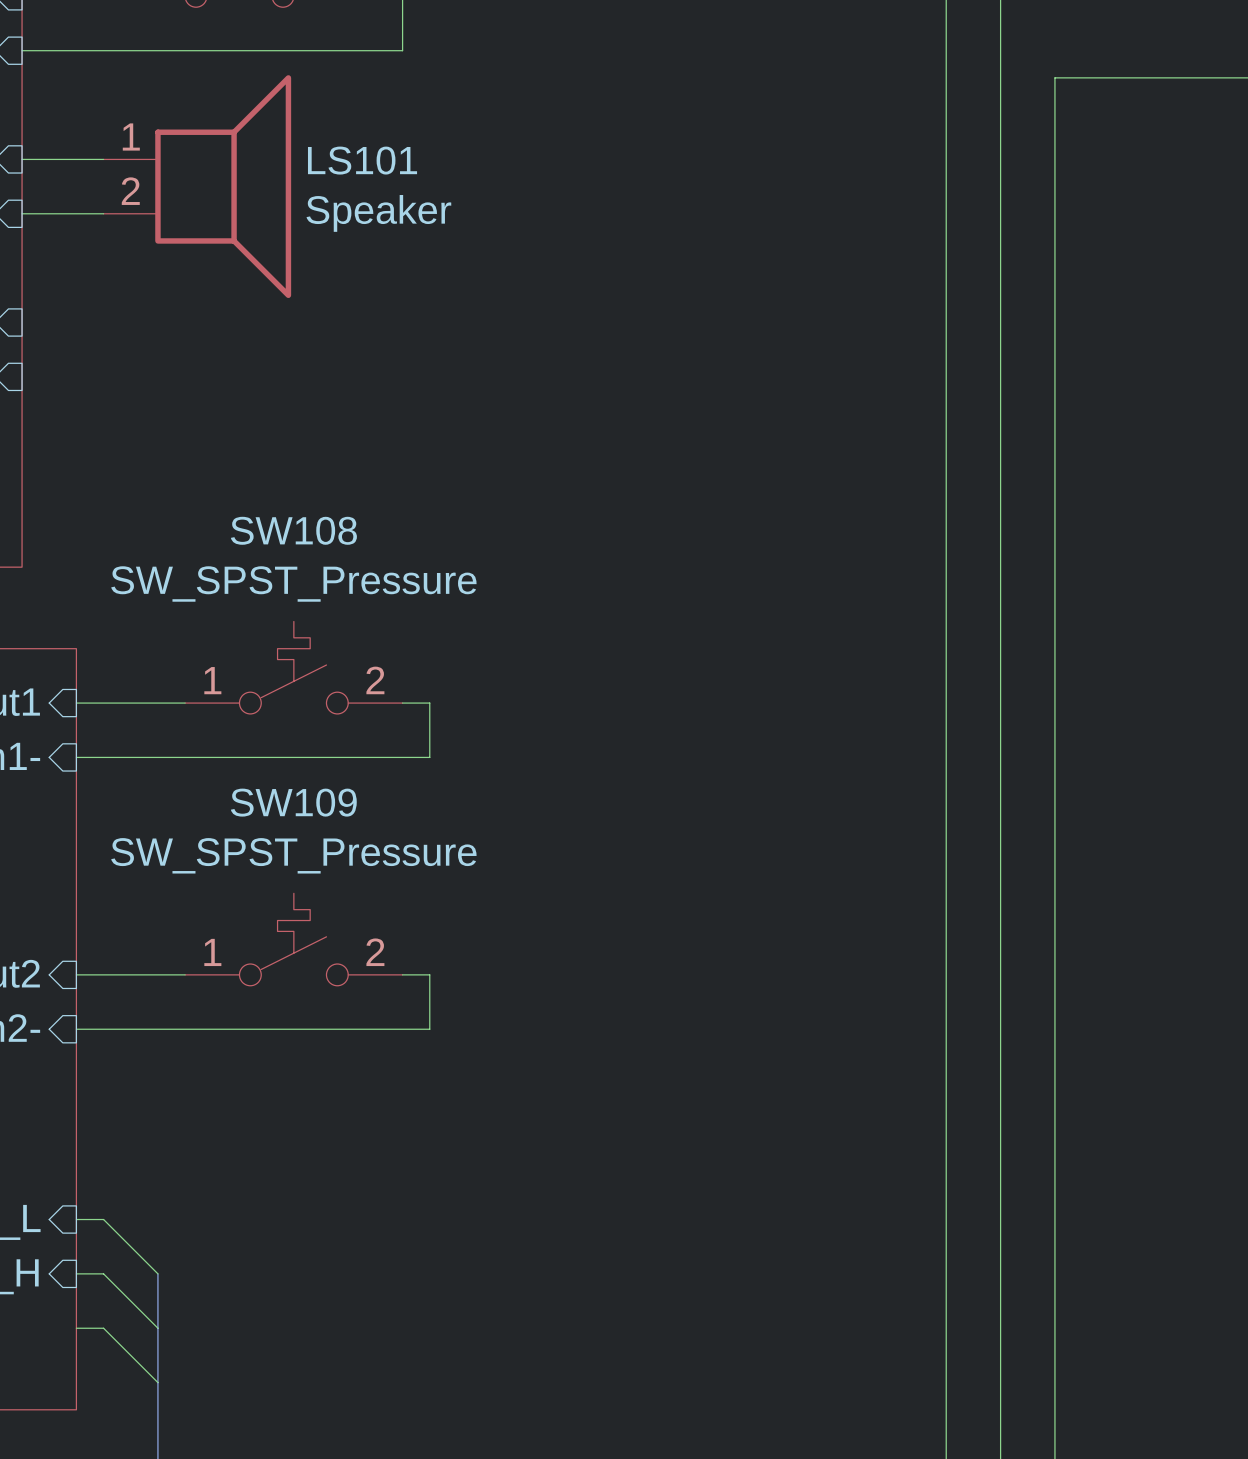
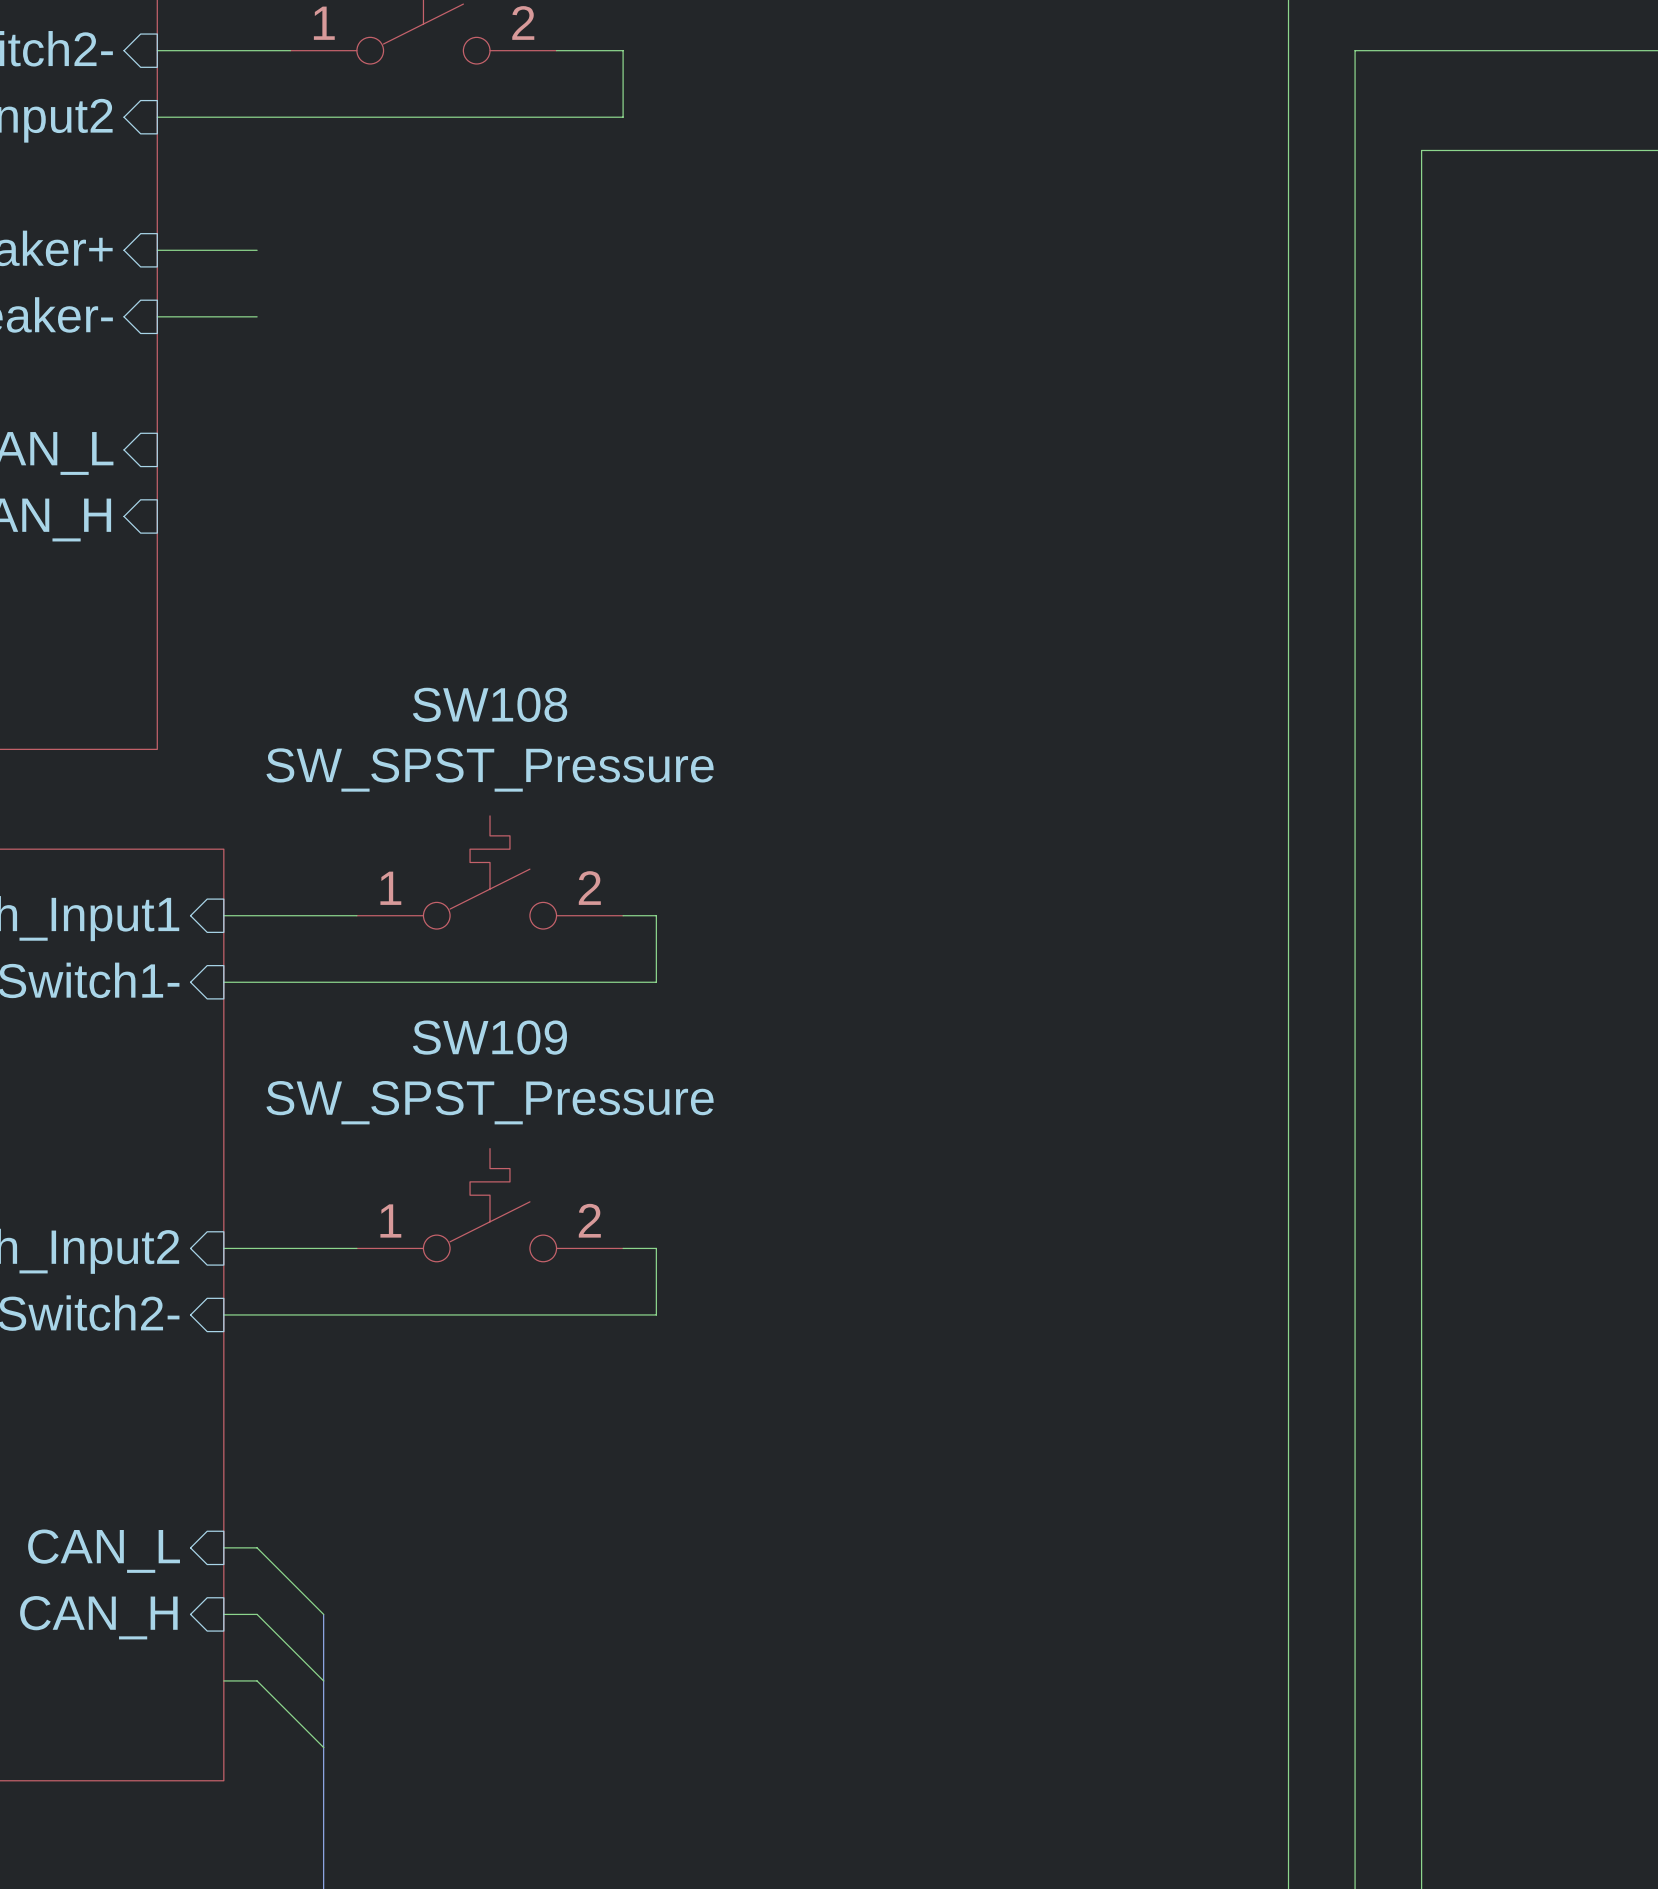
LS101: Speaker (197, 186) -> none

